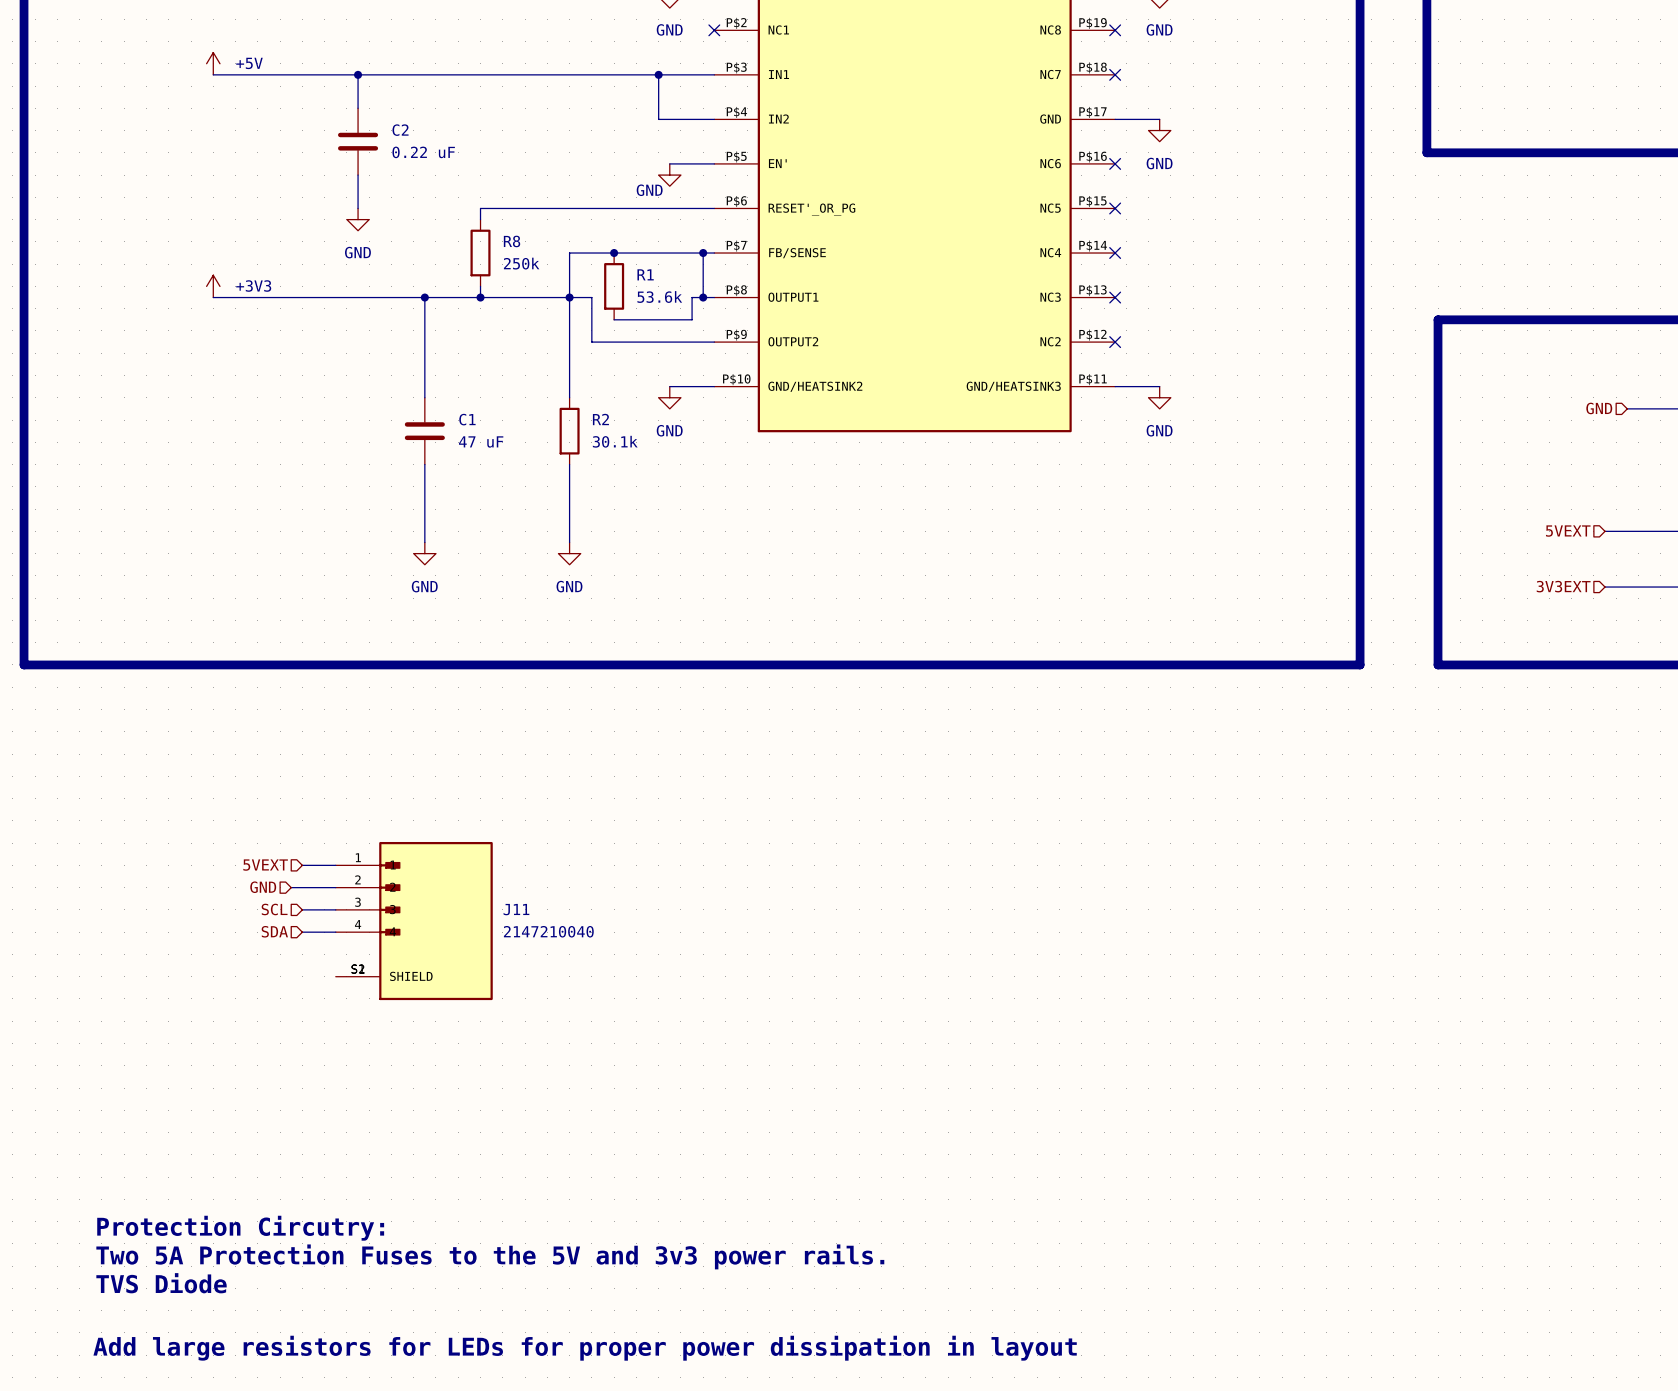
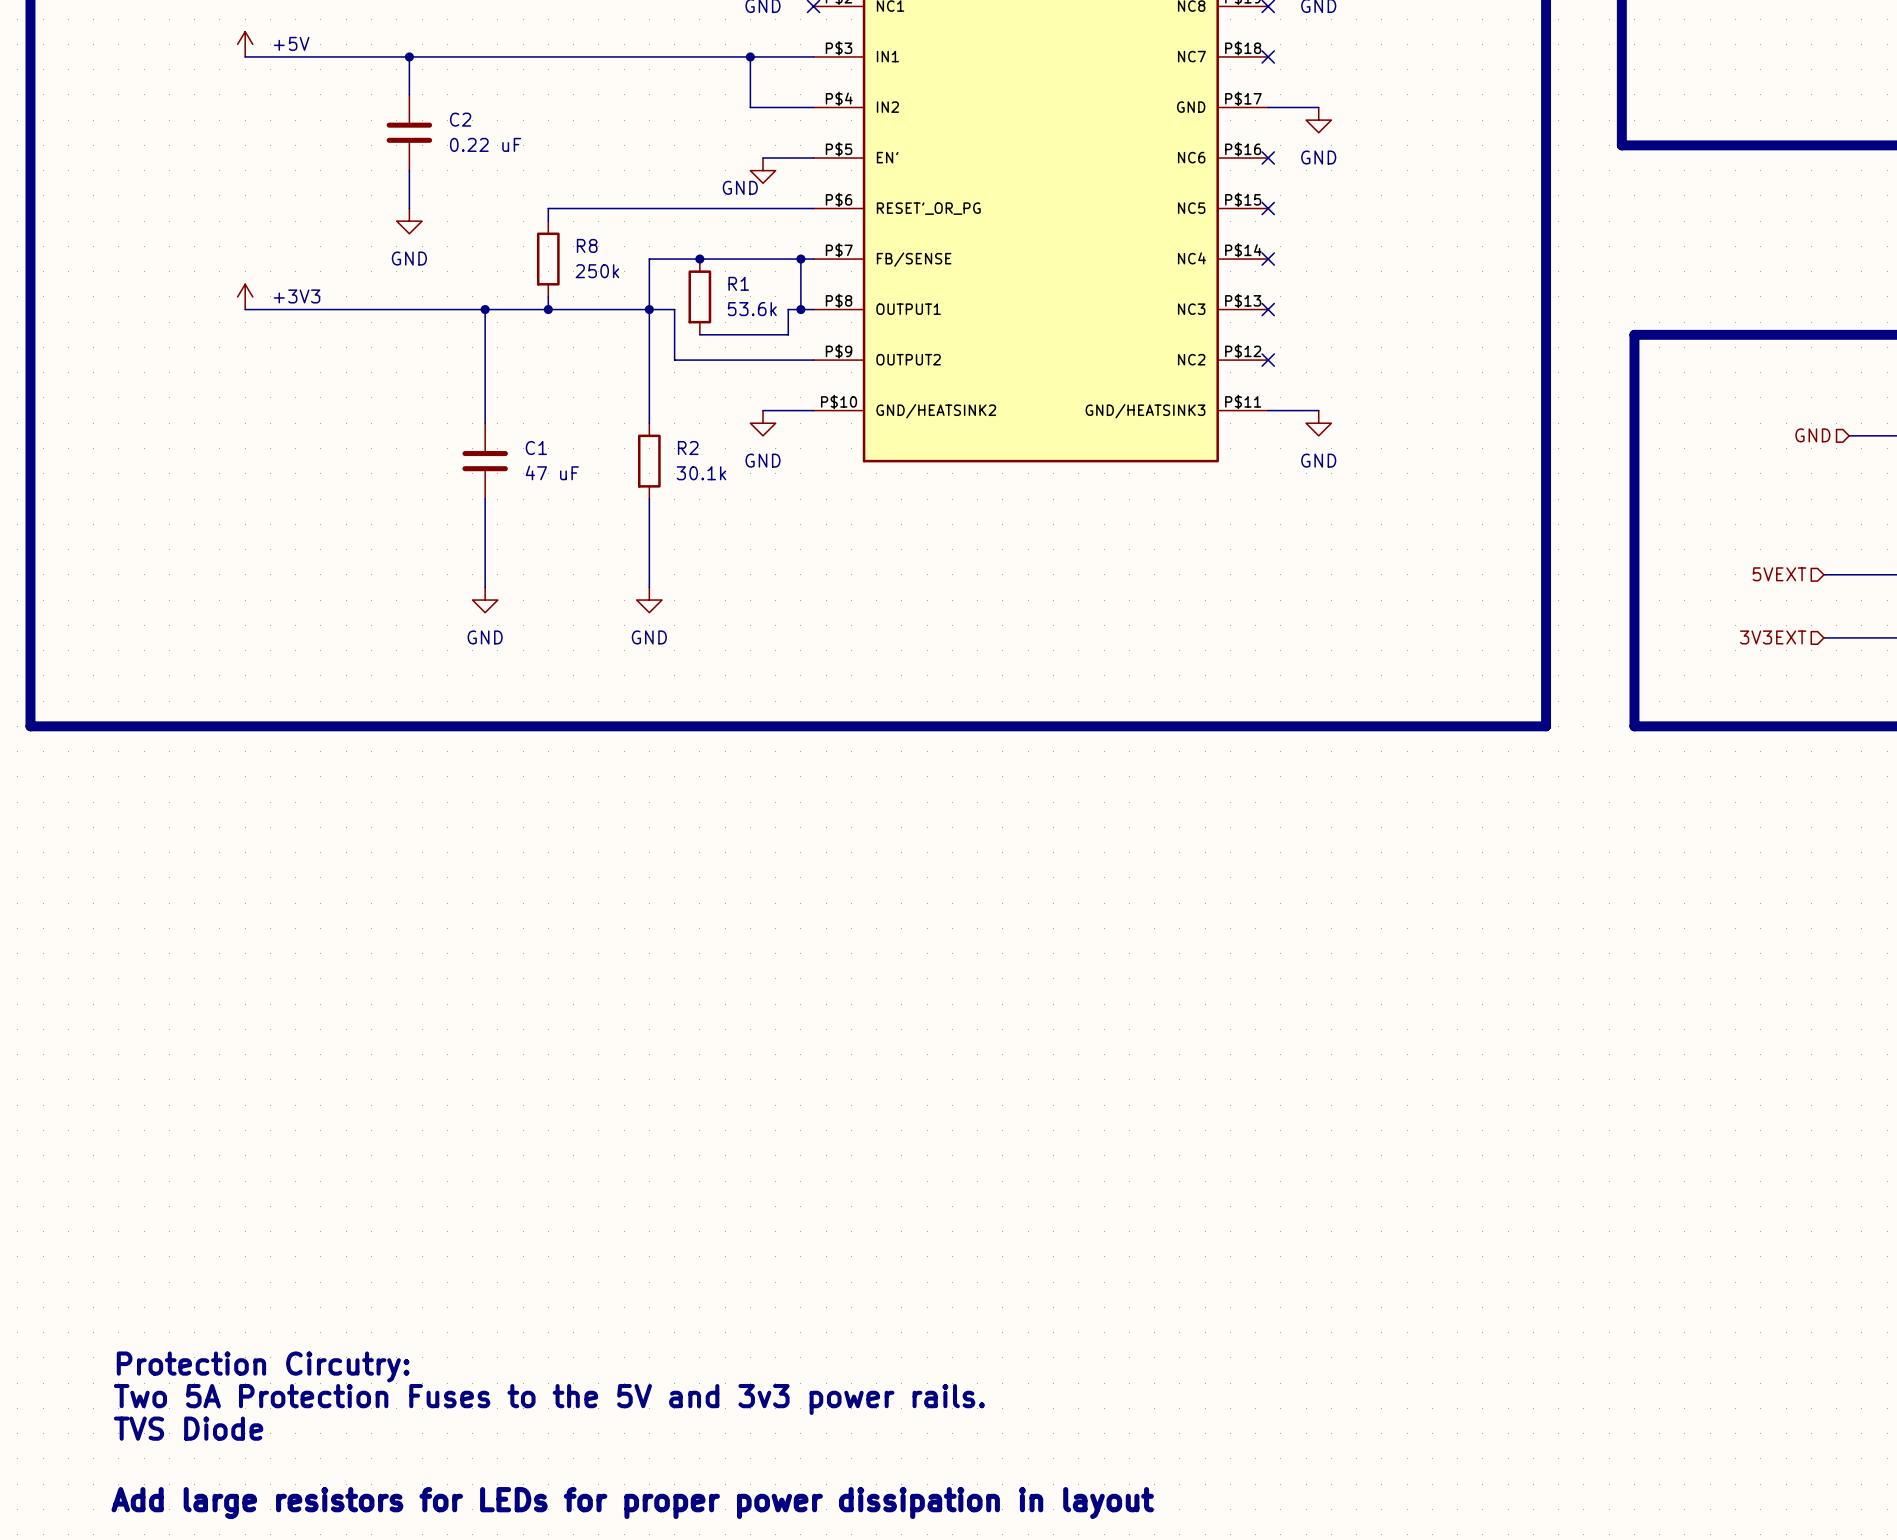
hierarchical label: 5VEXT (265, 865) -> none
wire: (302, 865) (335, 865) -> none
hierarchical label: GND (263, 887) -> none
wire: (291, 887) (335, 887) -> none
hierarchical label: SCL (274, 909) -> none
wire: (302, 909) (335, 909) -> none
J11: 2147210040 (414, 921) -> none
hierarchical label: SDA (274, 931) -> none
wire: (302, 932) (335, 932) -> none

